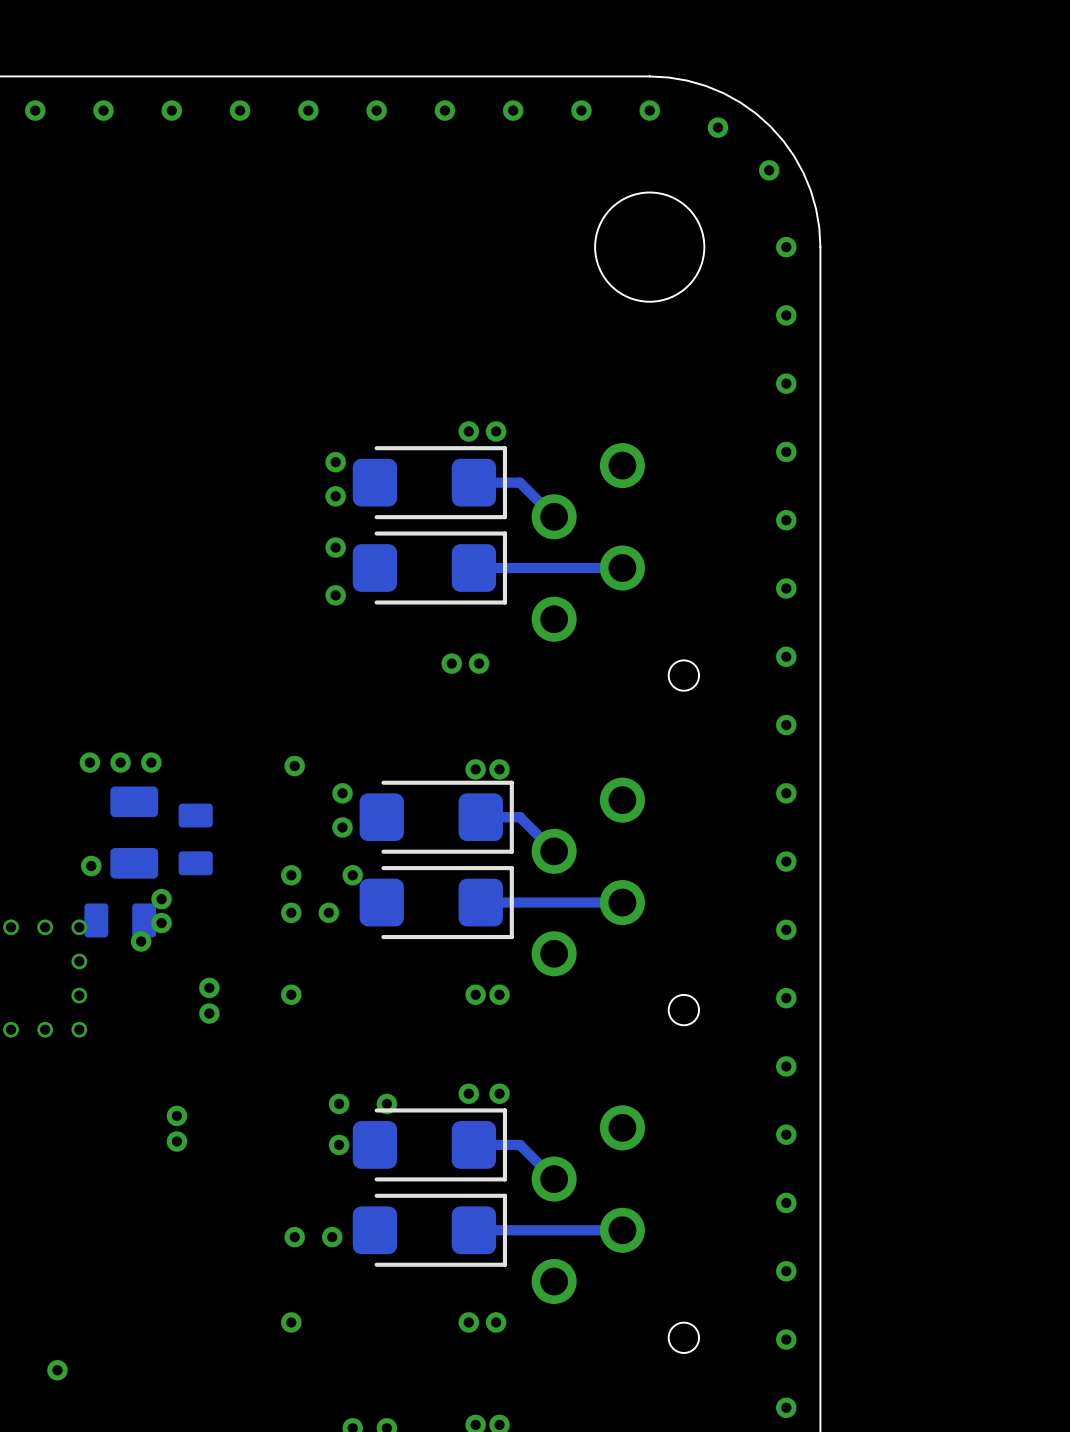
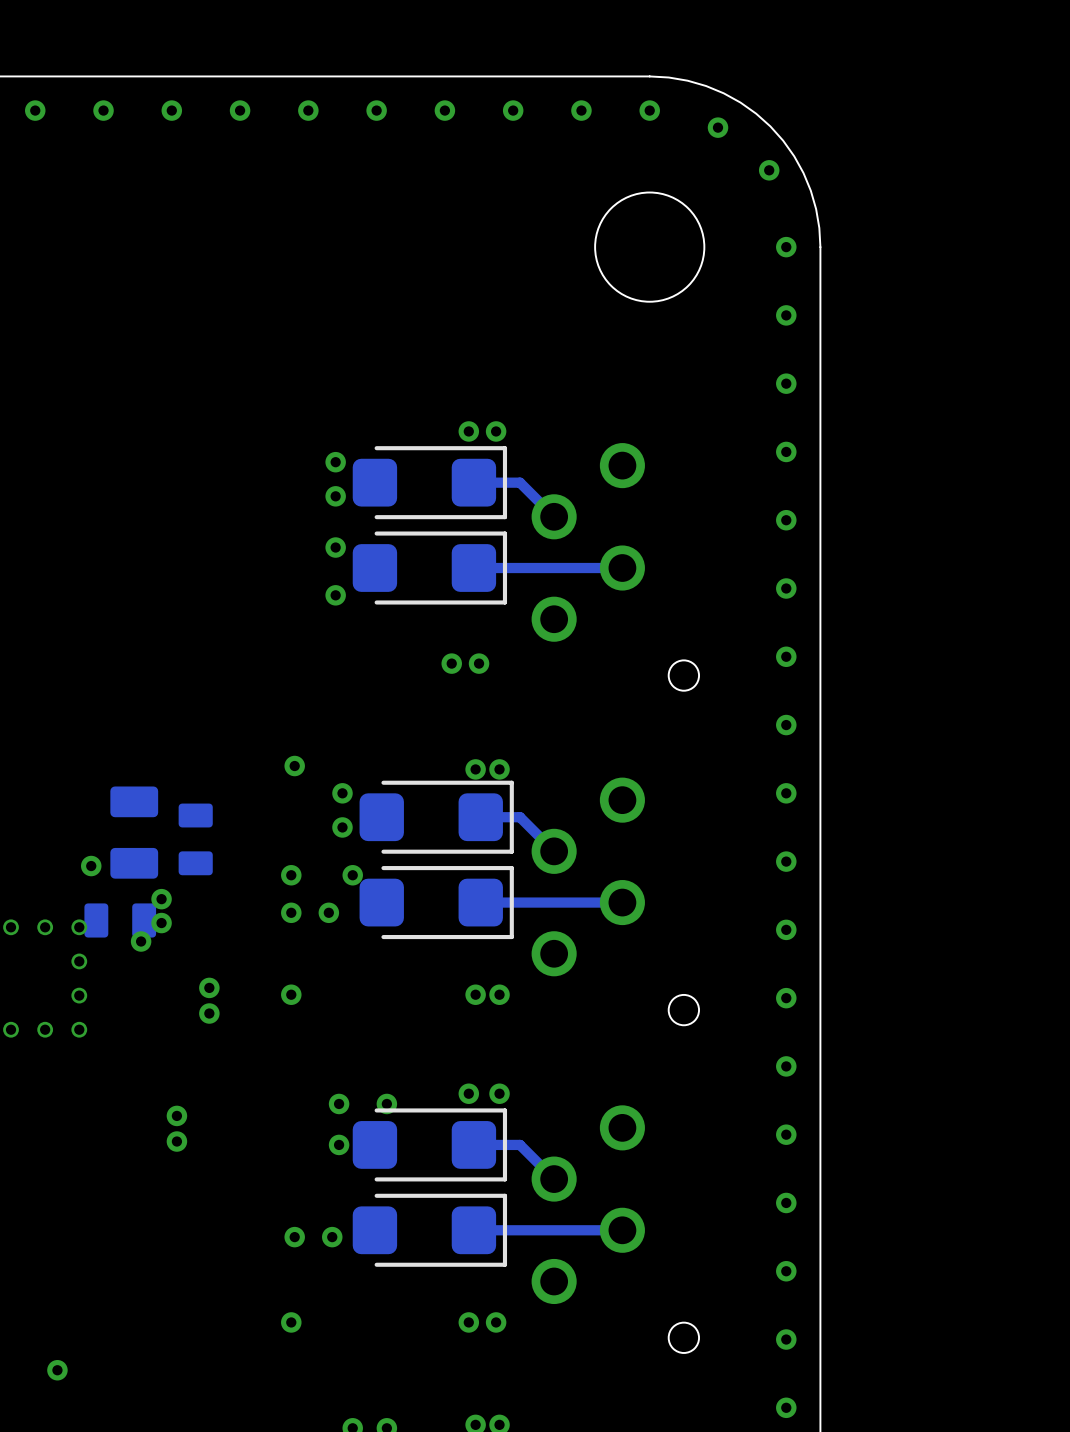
via: (89, 762) -> none
via: (120, 762) -> none
via: (151, 762) -> none

